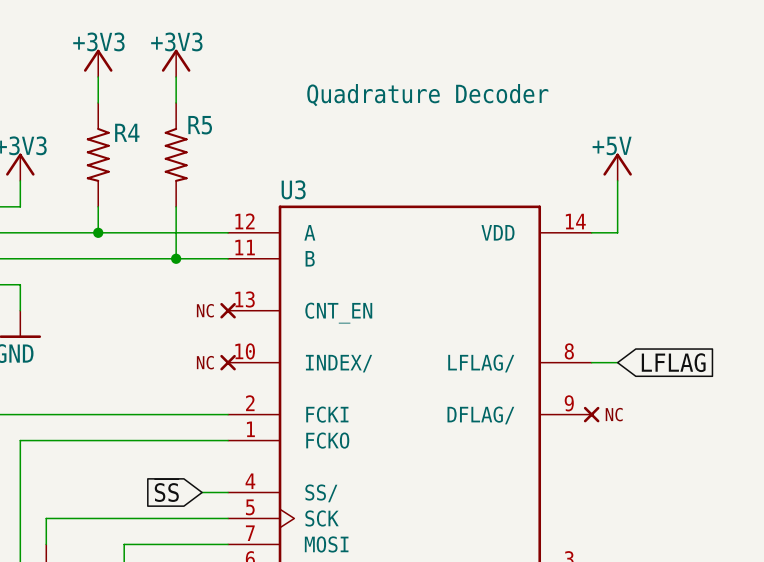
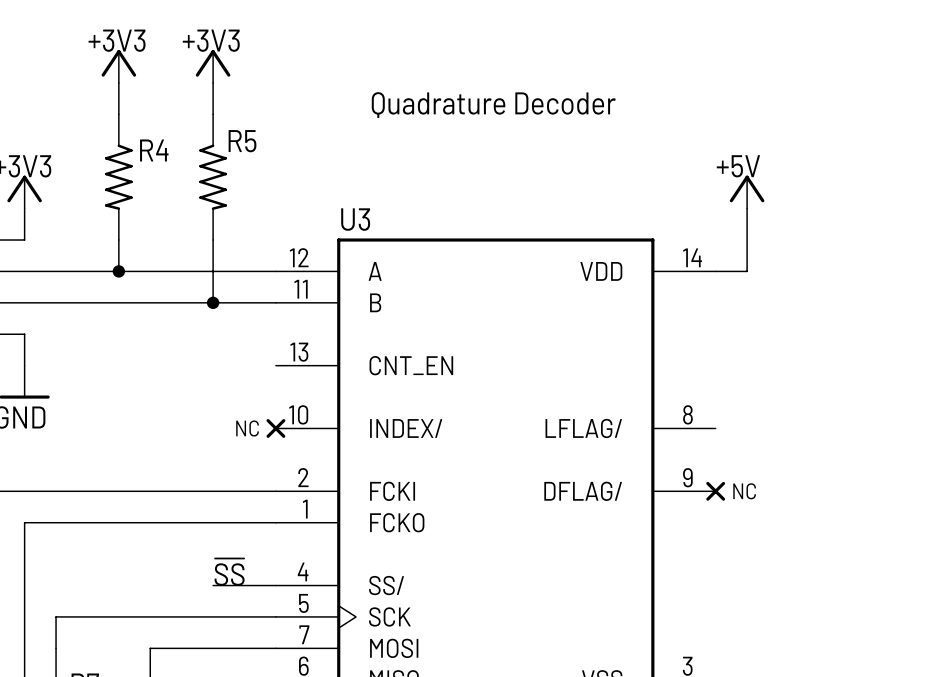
part: (228, 310) -> none
wire: (591, 362) (617, 362) -> none
global label: LFLAG (673, 362) -> none
label: none -> ~{SS} (229, 572)
global label: ~{SS} (166, 490) -> none
wire: none -> (213, 585) (244, 585)

